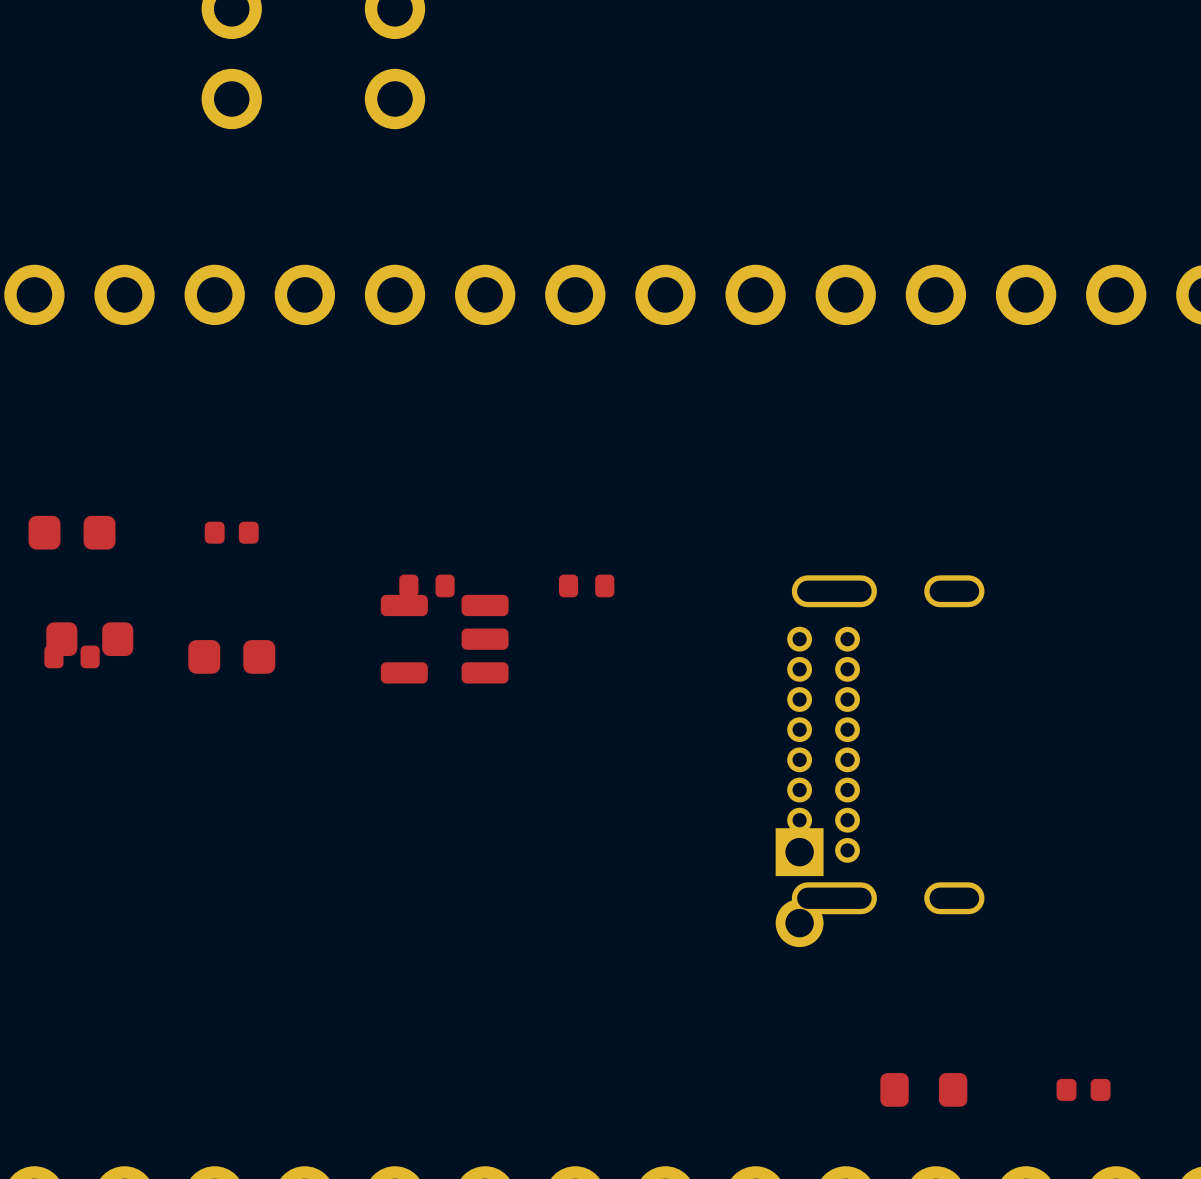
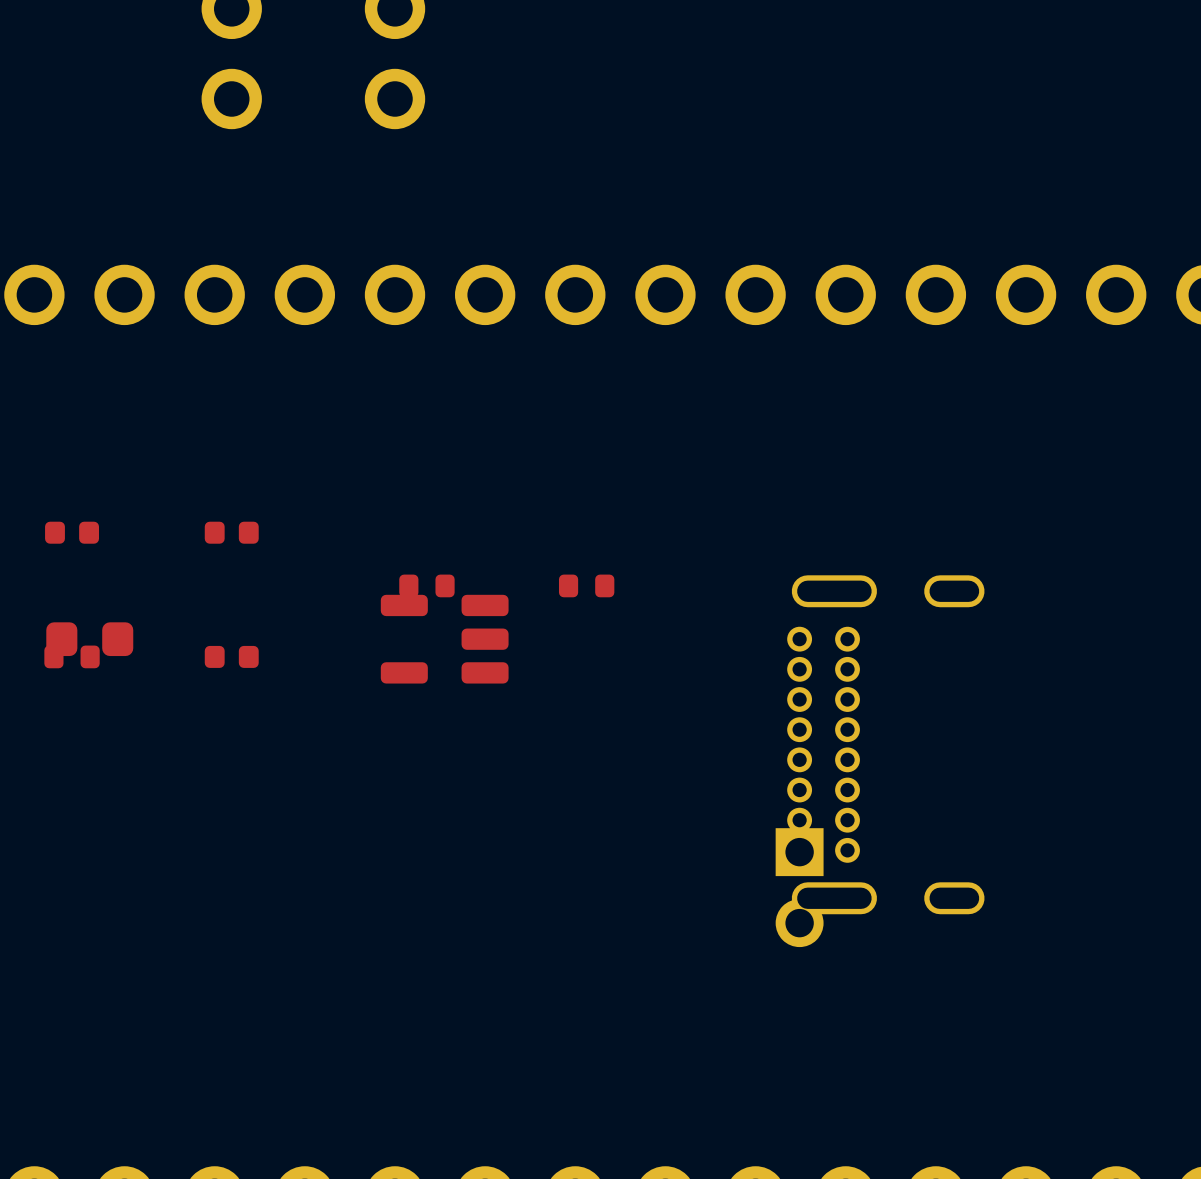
part footprint: [28, 515, 116, 550] -> [45, 521, 100, 544]
part footprint: [188, 640, 276, 674] -> [204, 645, 259, 668]
part: (923, 1089) -> none
part: (1083, 1089) -> none

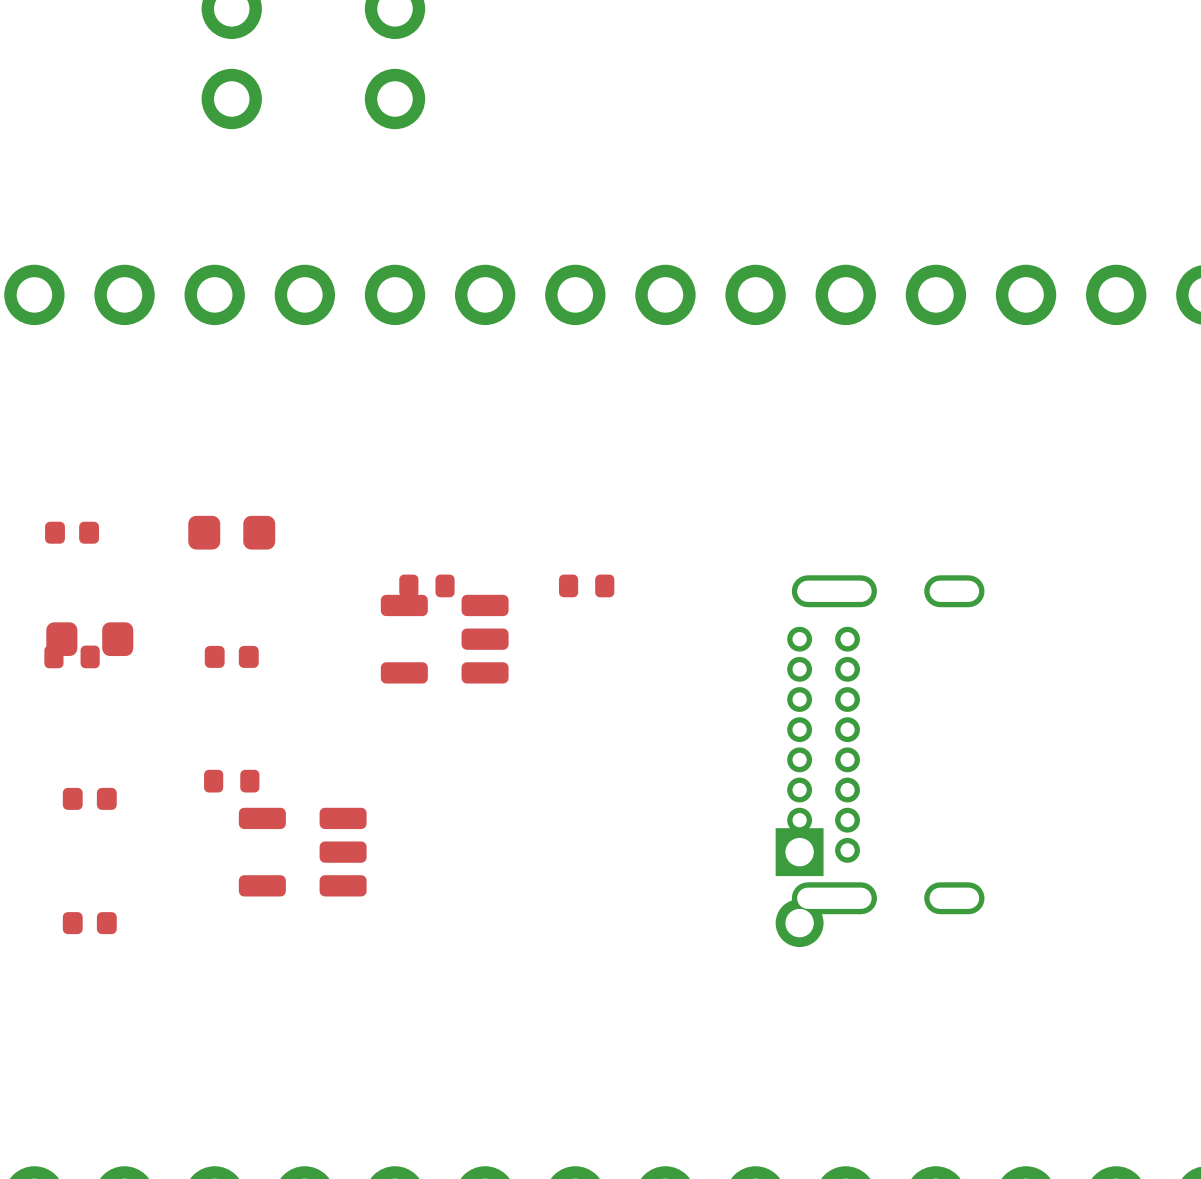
part footprint: [204, 521, 259, 544] -> [188, 515, 276, 550]
part: none -> (231, 781)
part: none -> (89, 798)
part: none -> (302, 852)
part: none -> (89, 923)

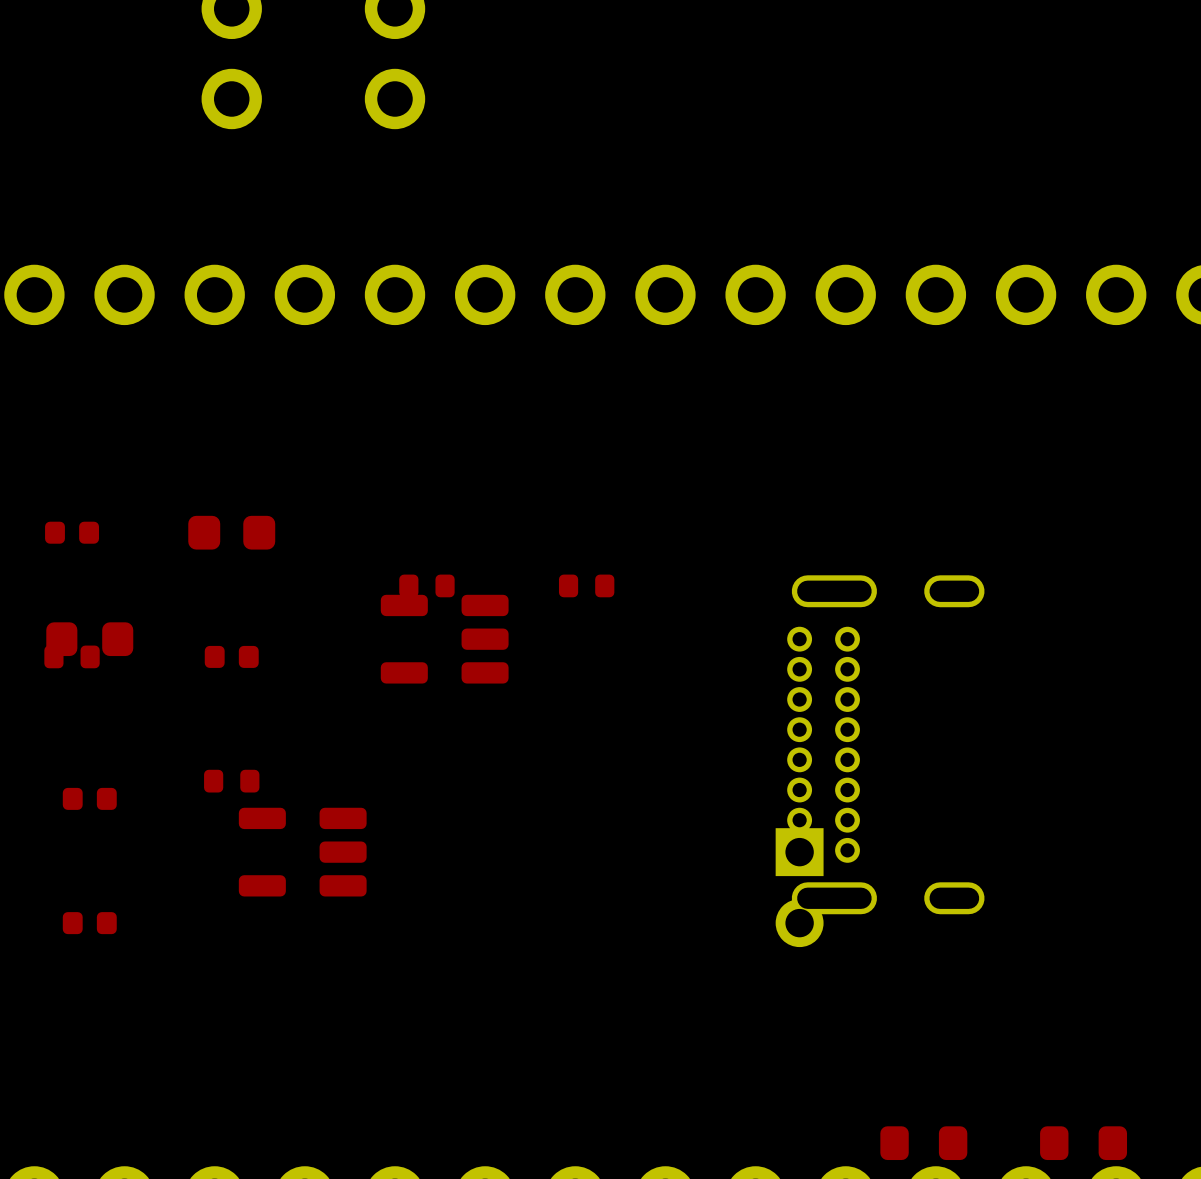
part: none -> (923, 1143)
part: none -> (1083, 1143)

